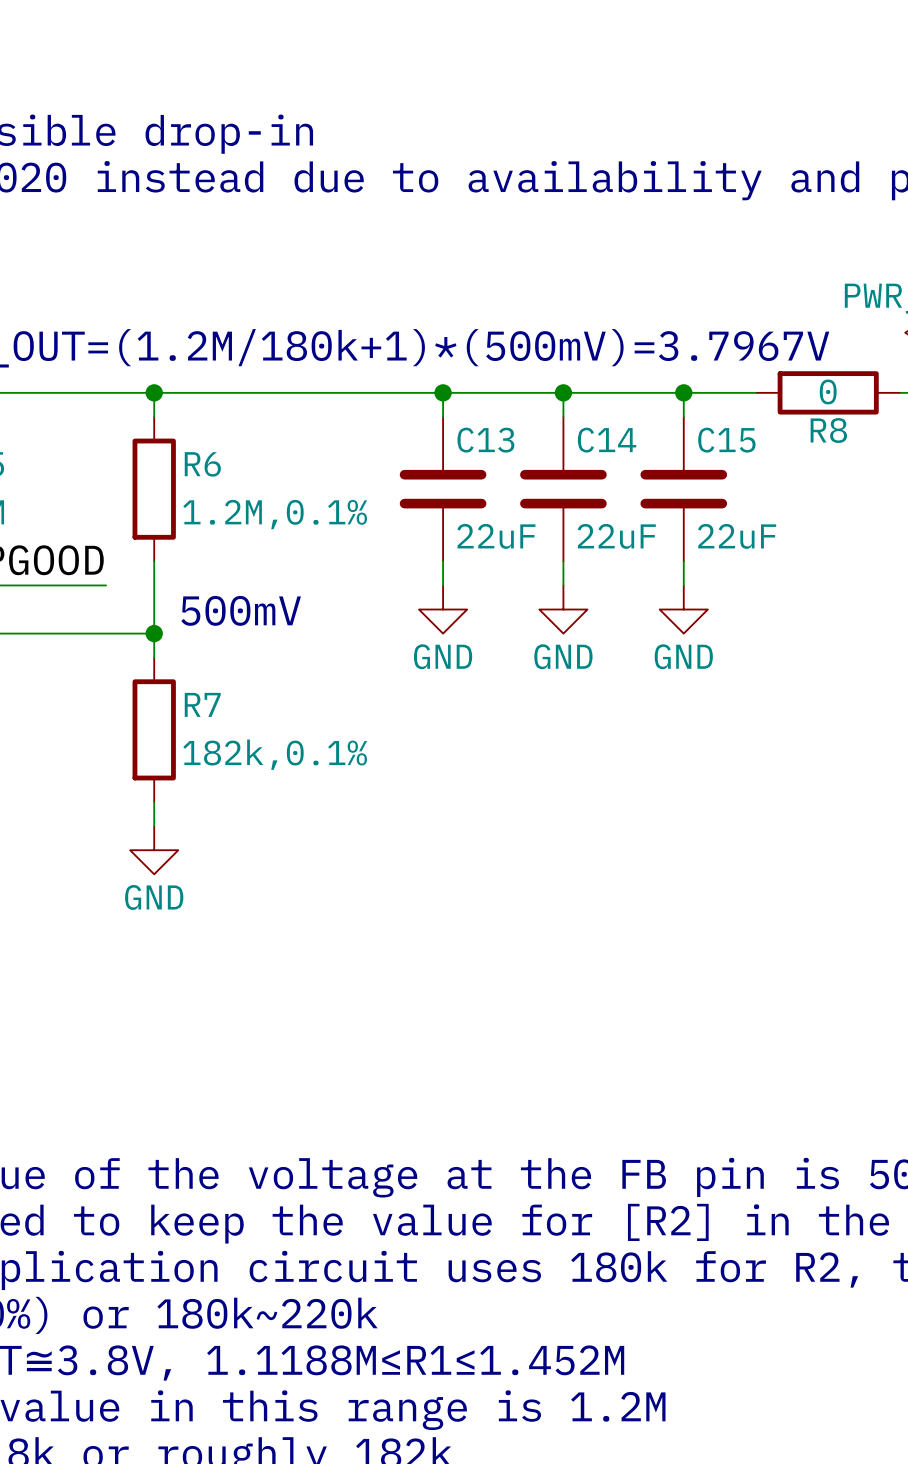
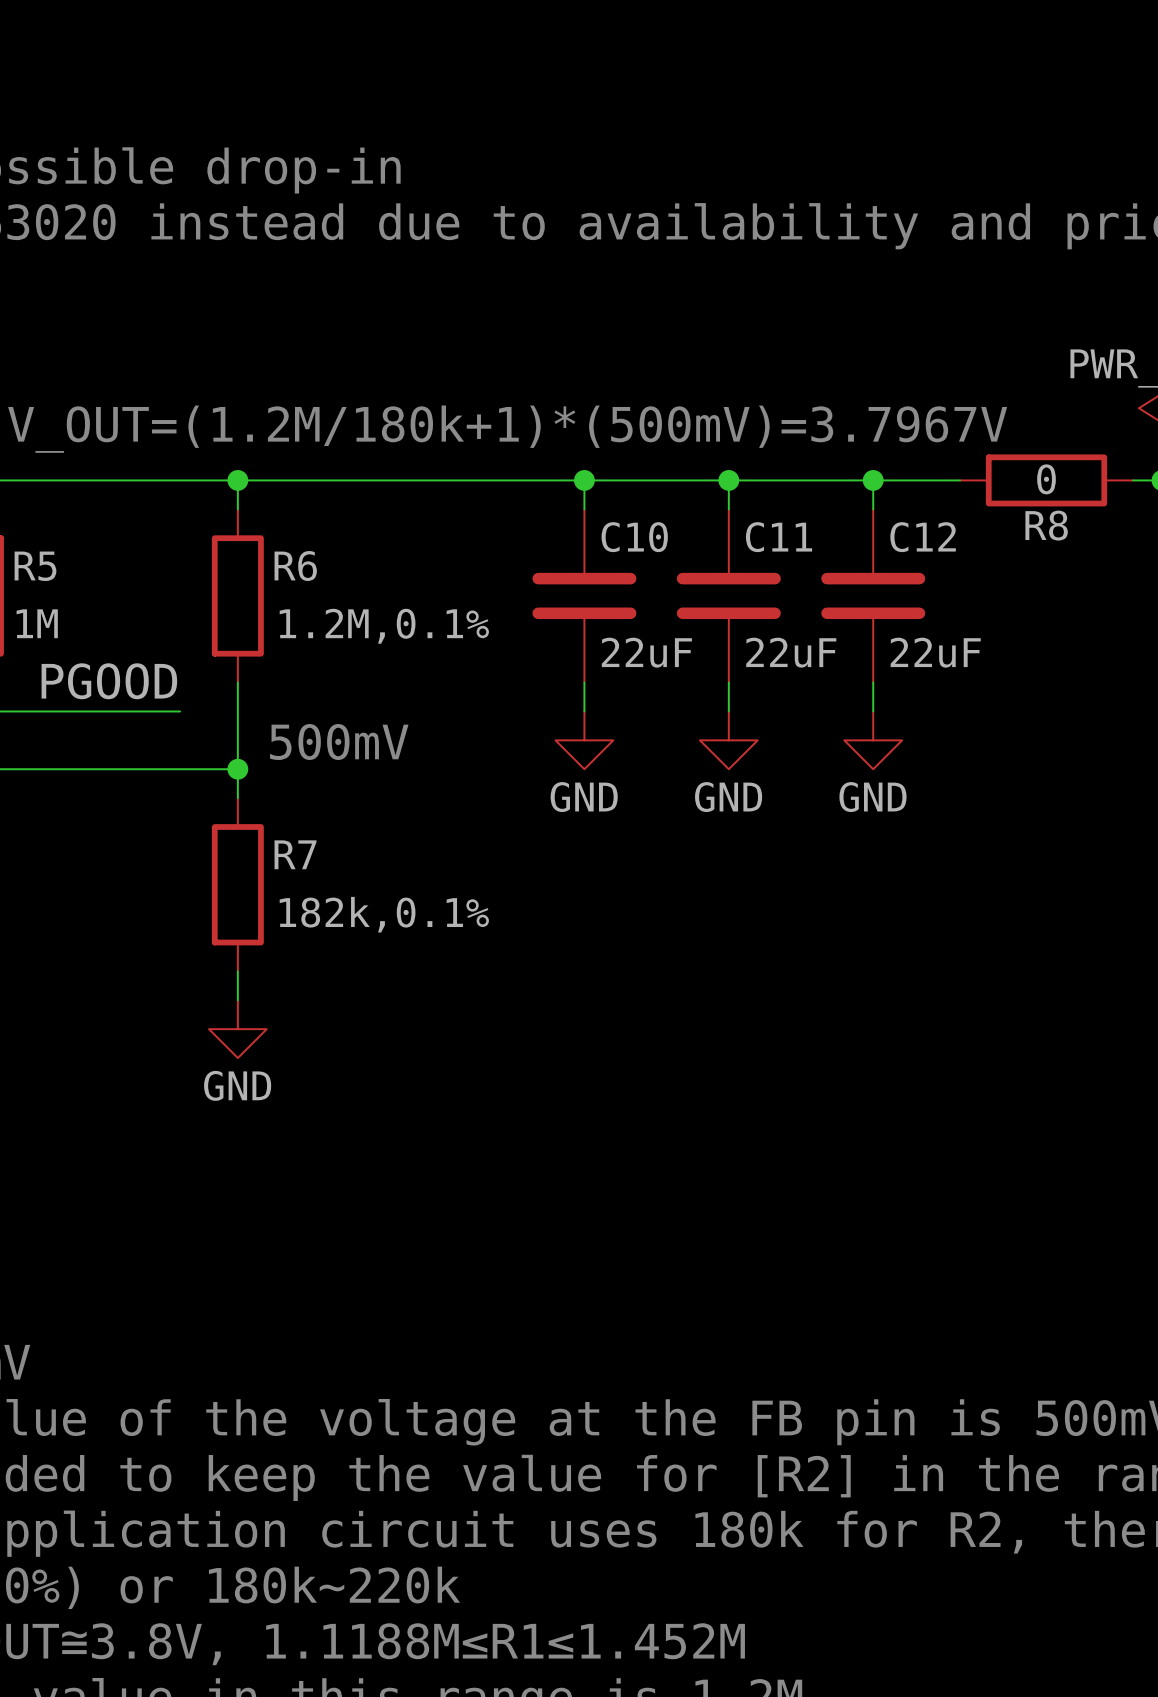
C13 name: C13 (485, 440) -> C10 (634, 537)
C14 name: C14 (607, 440) -> C11 (779, 537)
C15 name: C15 (726, 440) -> C12 (923, 537)

